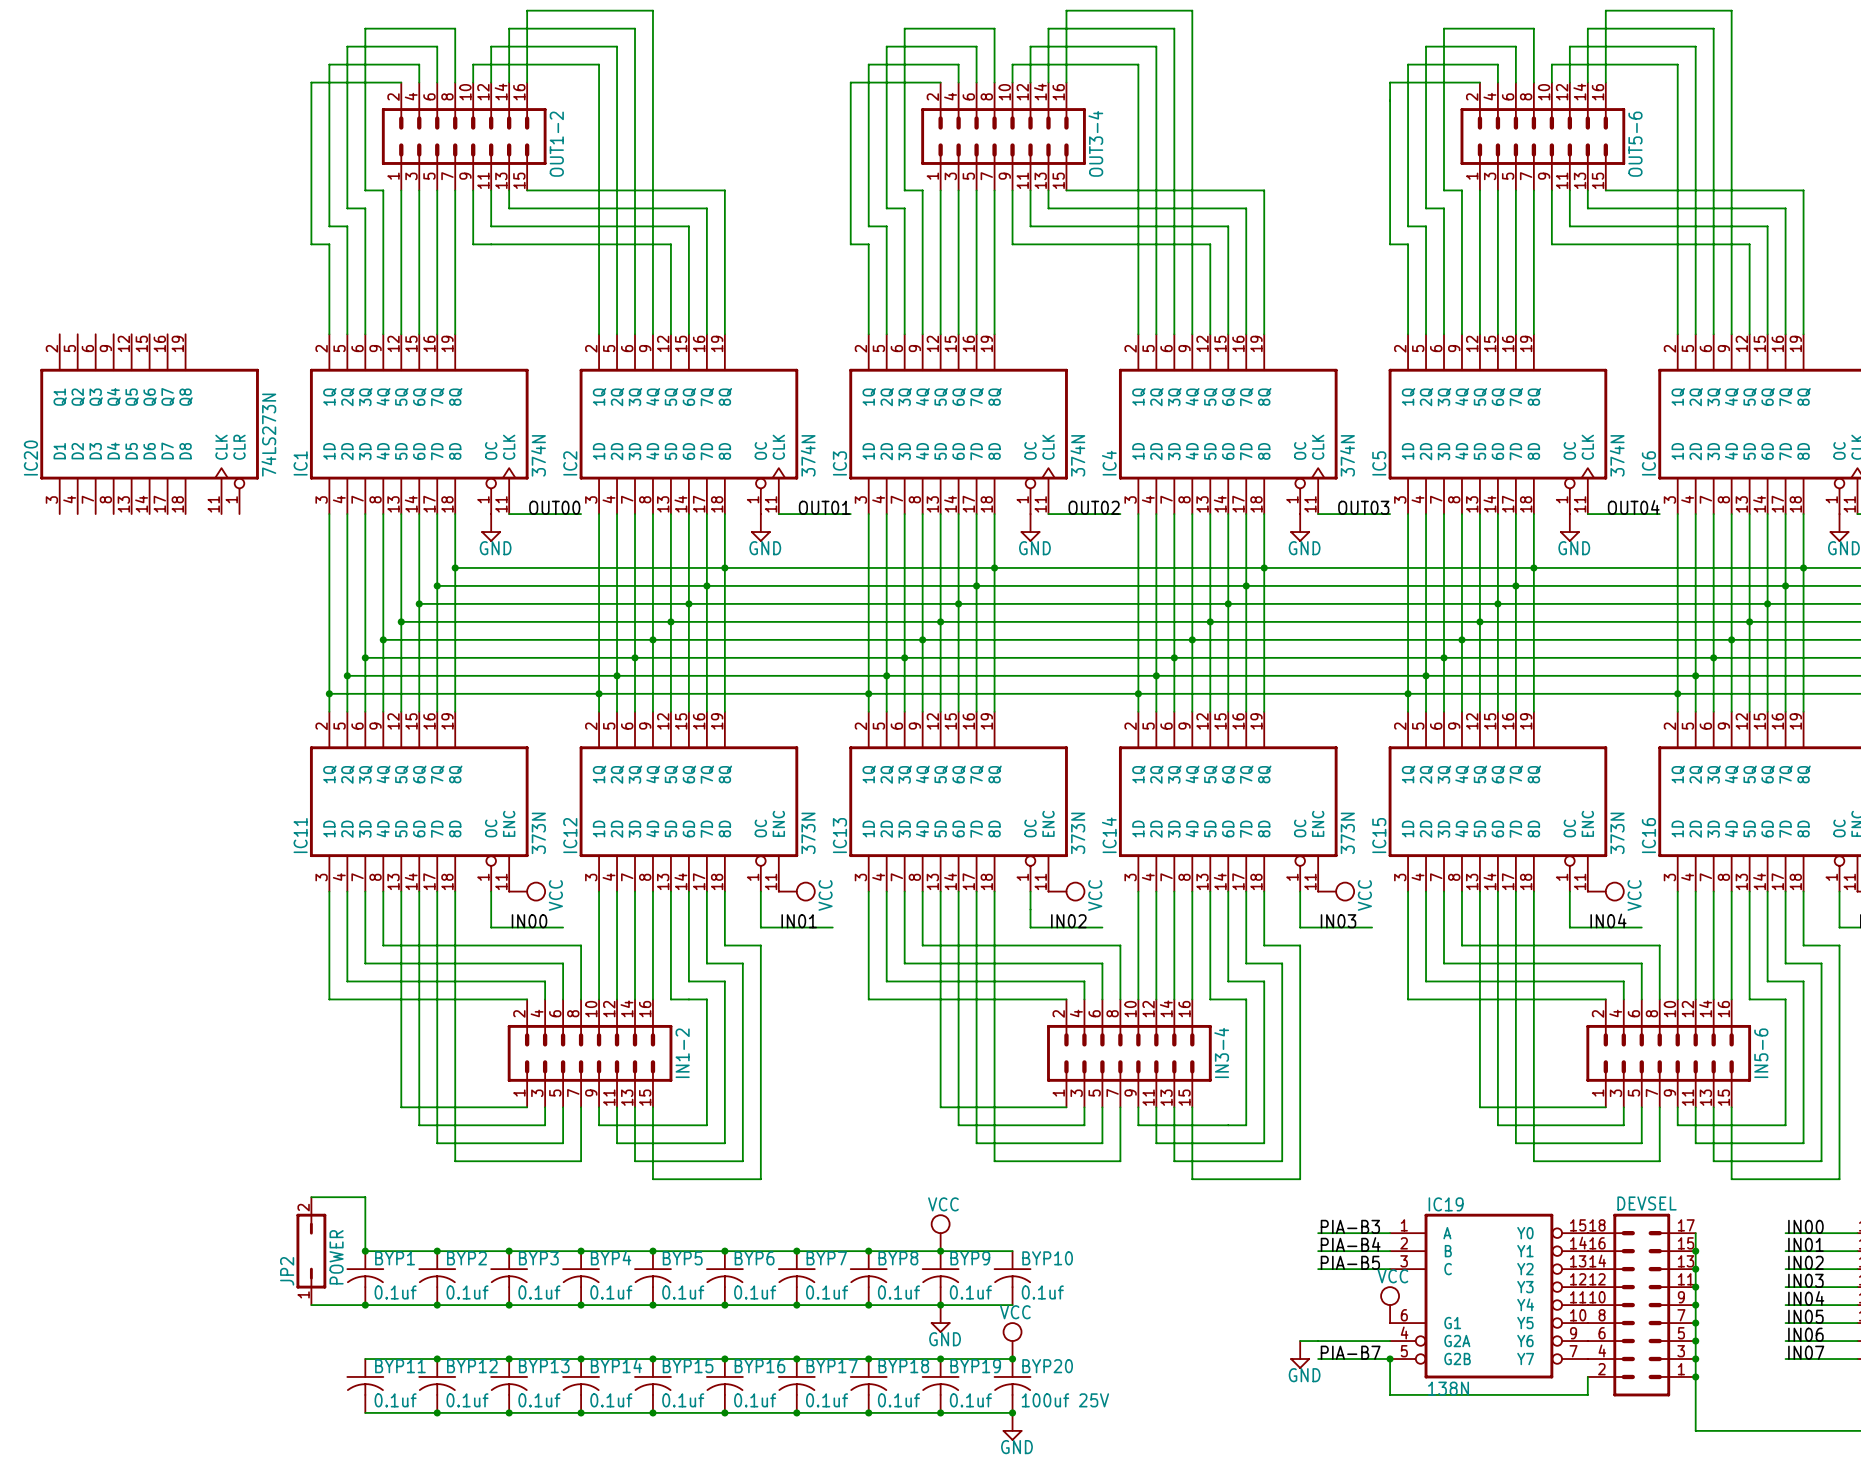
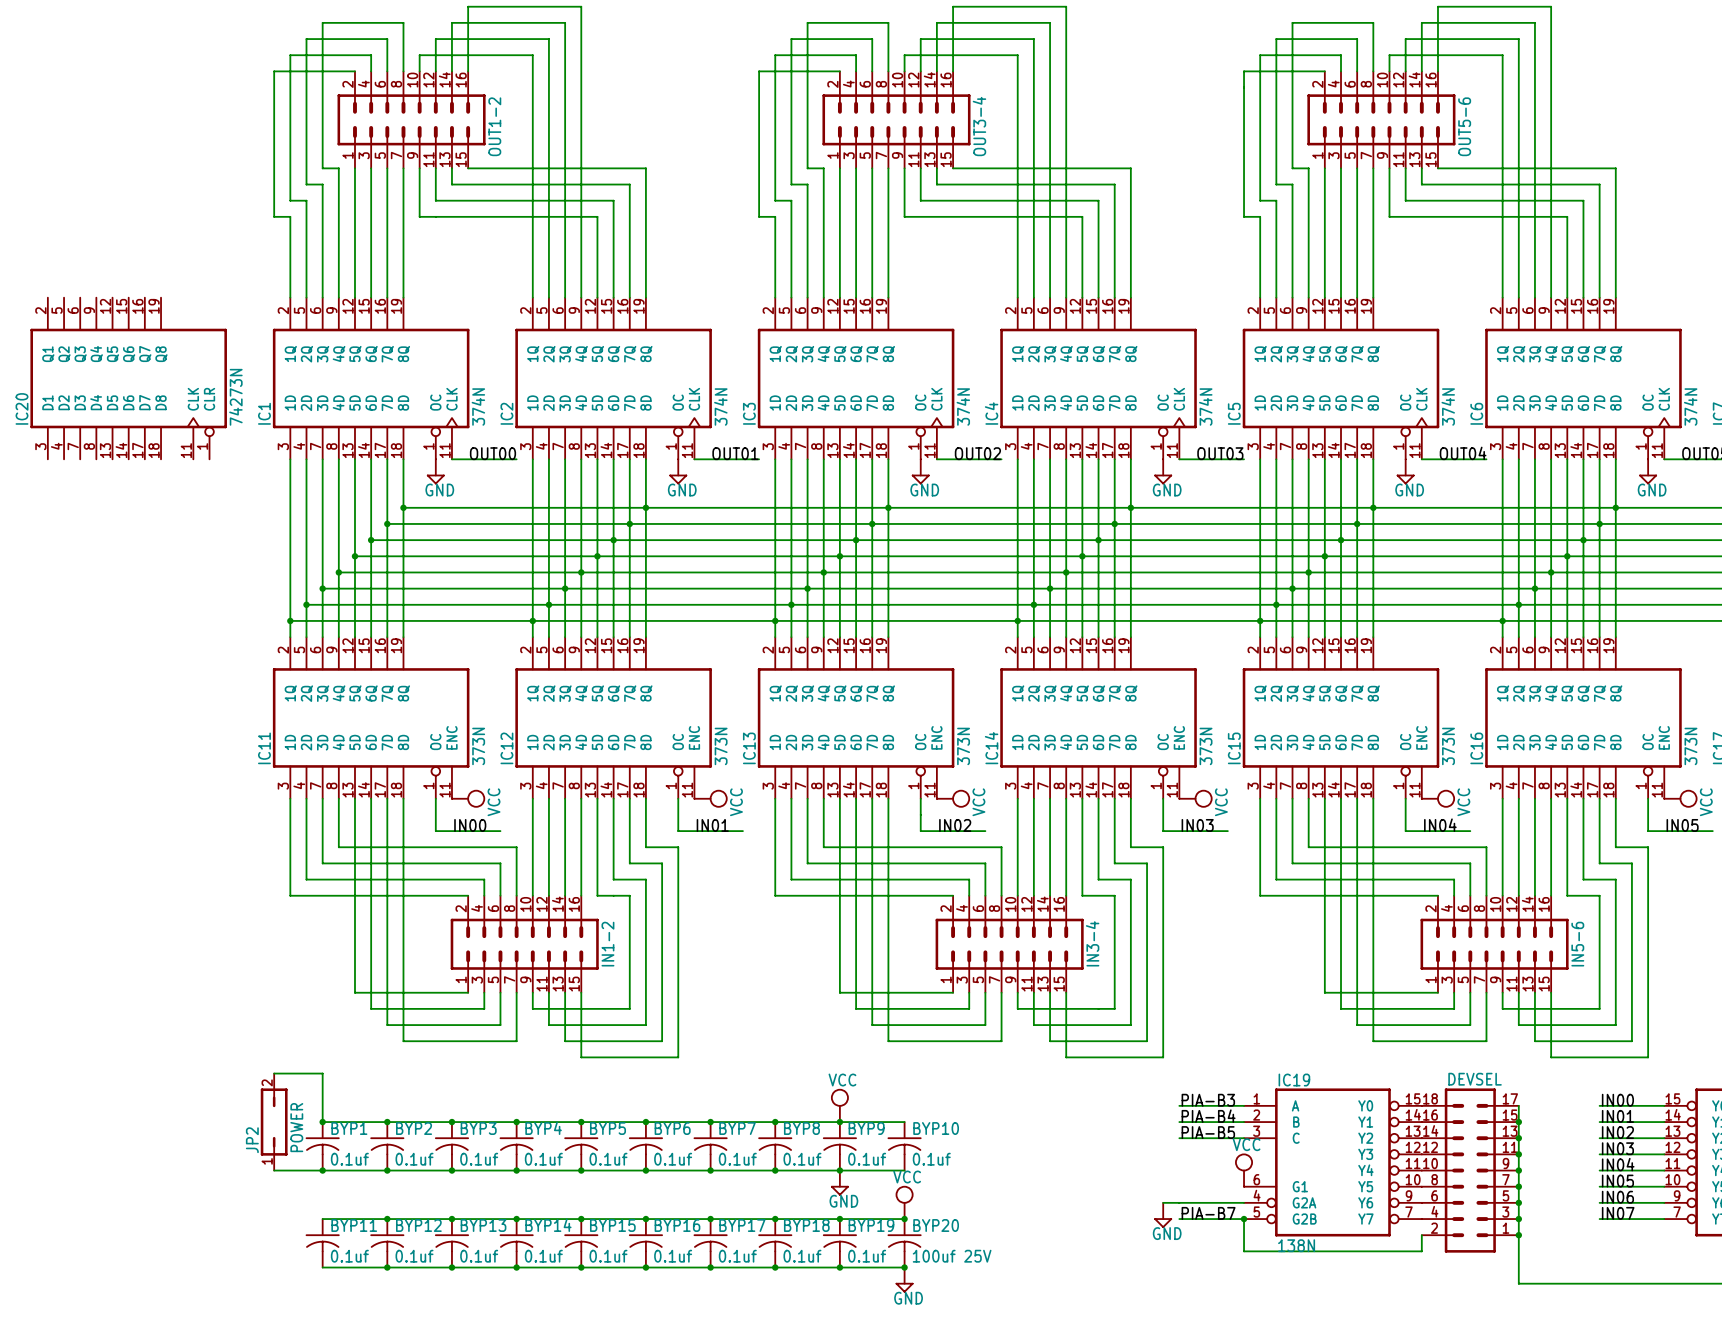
IC20 value: 74LS273N (268, 435) -> 74273N (235, 397)

